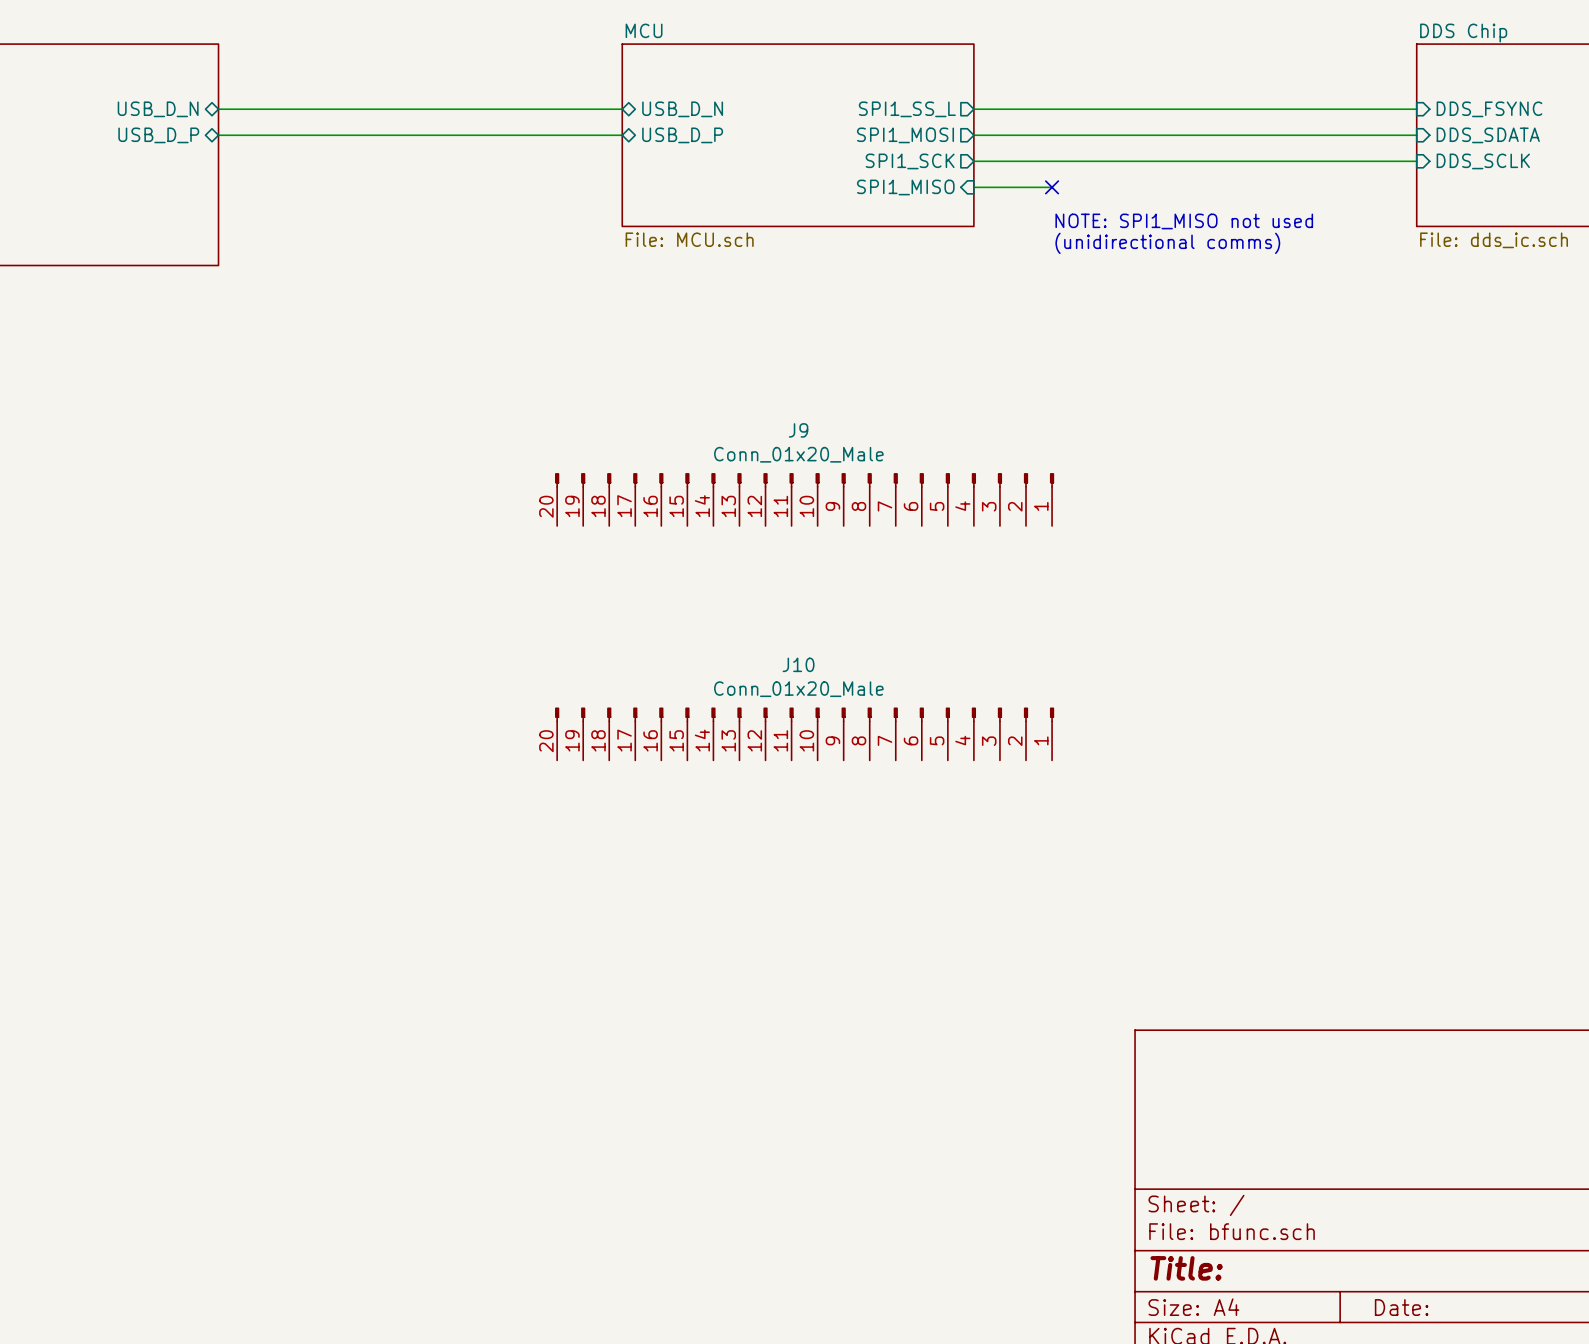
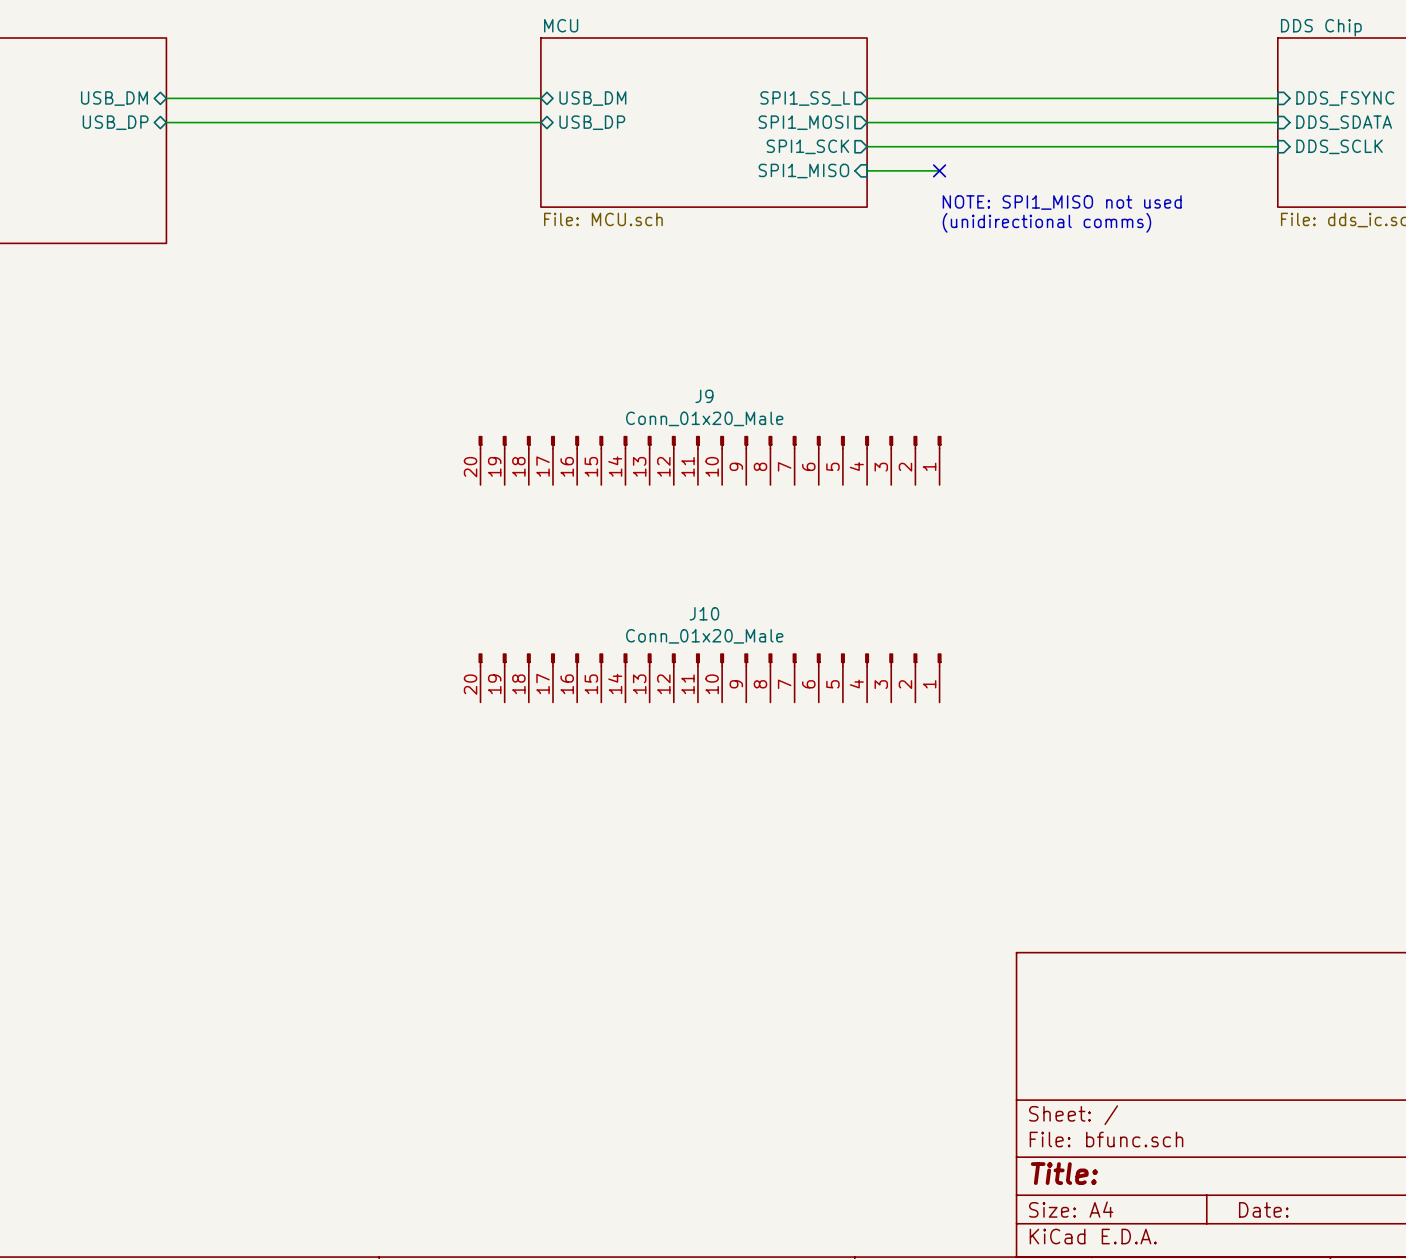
sheet pin: USB_D_N (158, 109) -> USB_DM (114, 98)
sheet pin: USB_D_N (682, 109) -> USB_DM (592, 98)
sheet pin: USB_D_P (158, 135) -> USB_DP (115, 122)
sheet pin: USB_D_P (682, 135) -> USB_DP (592, 122)

